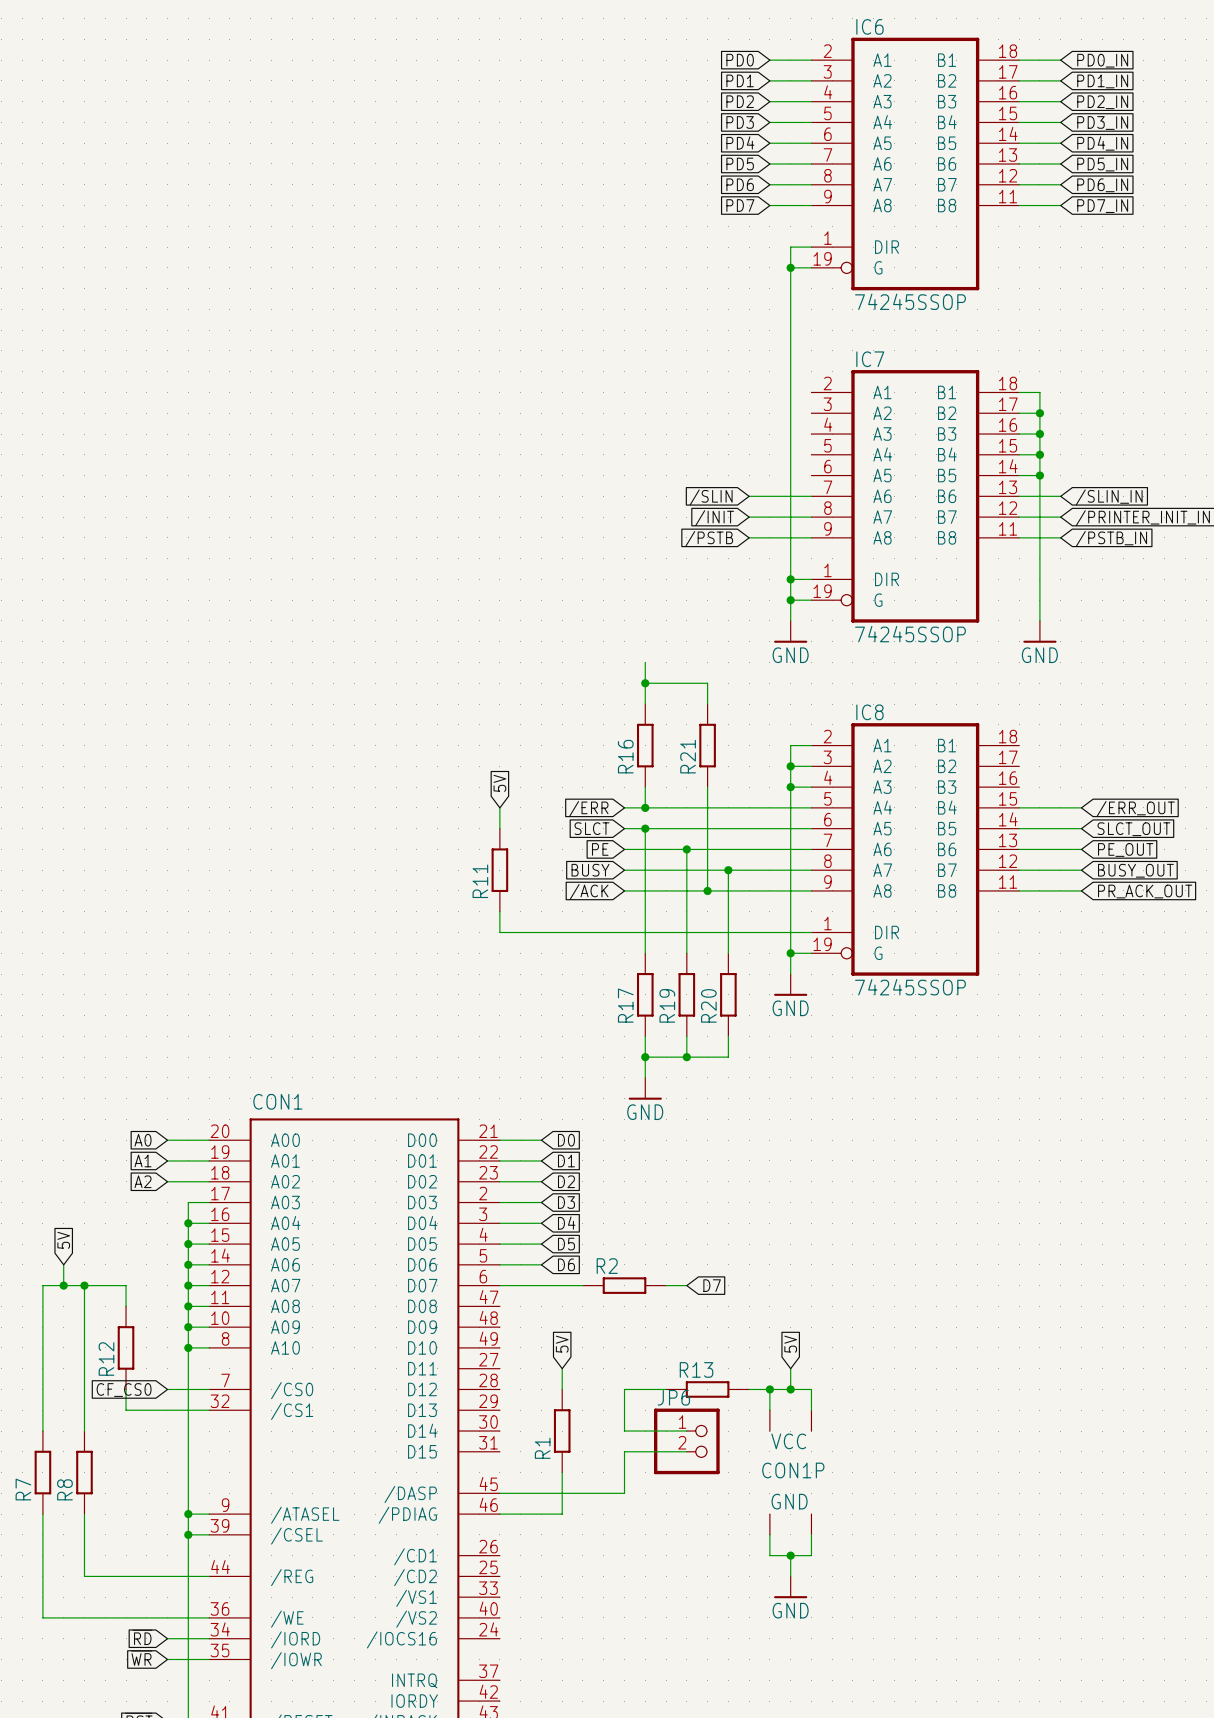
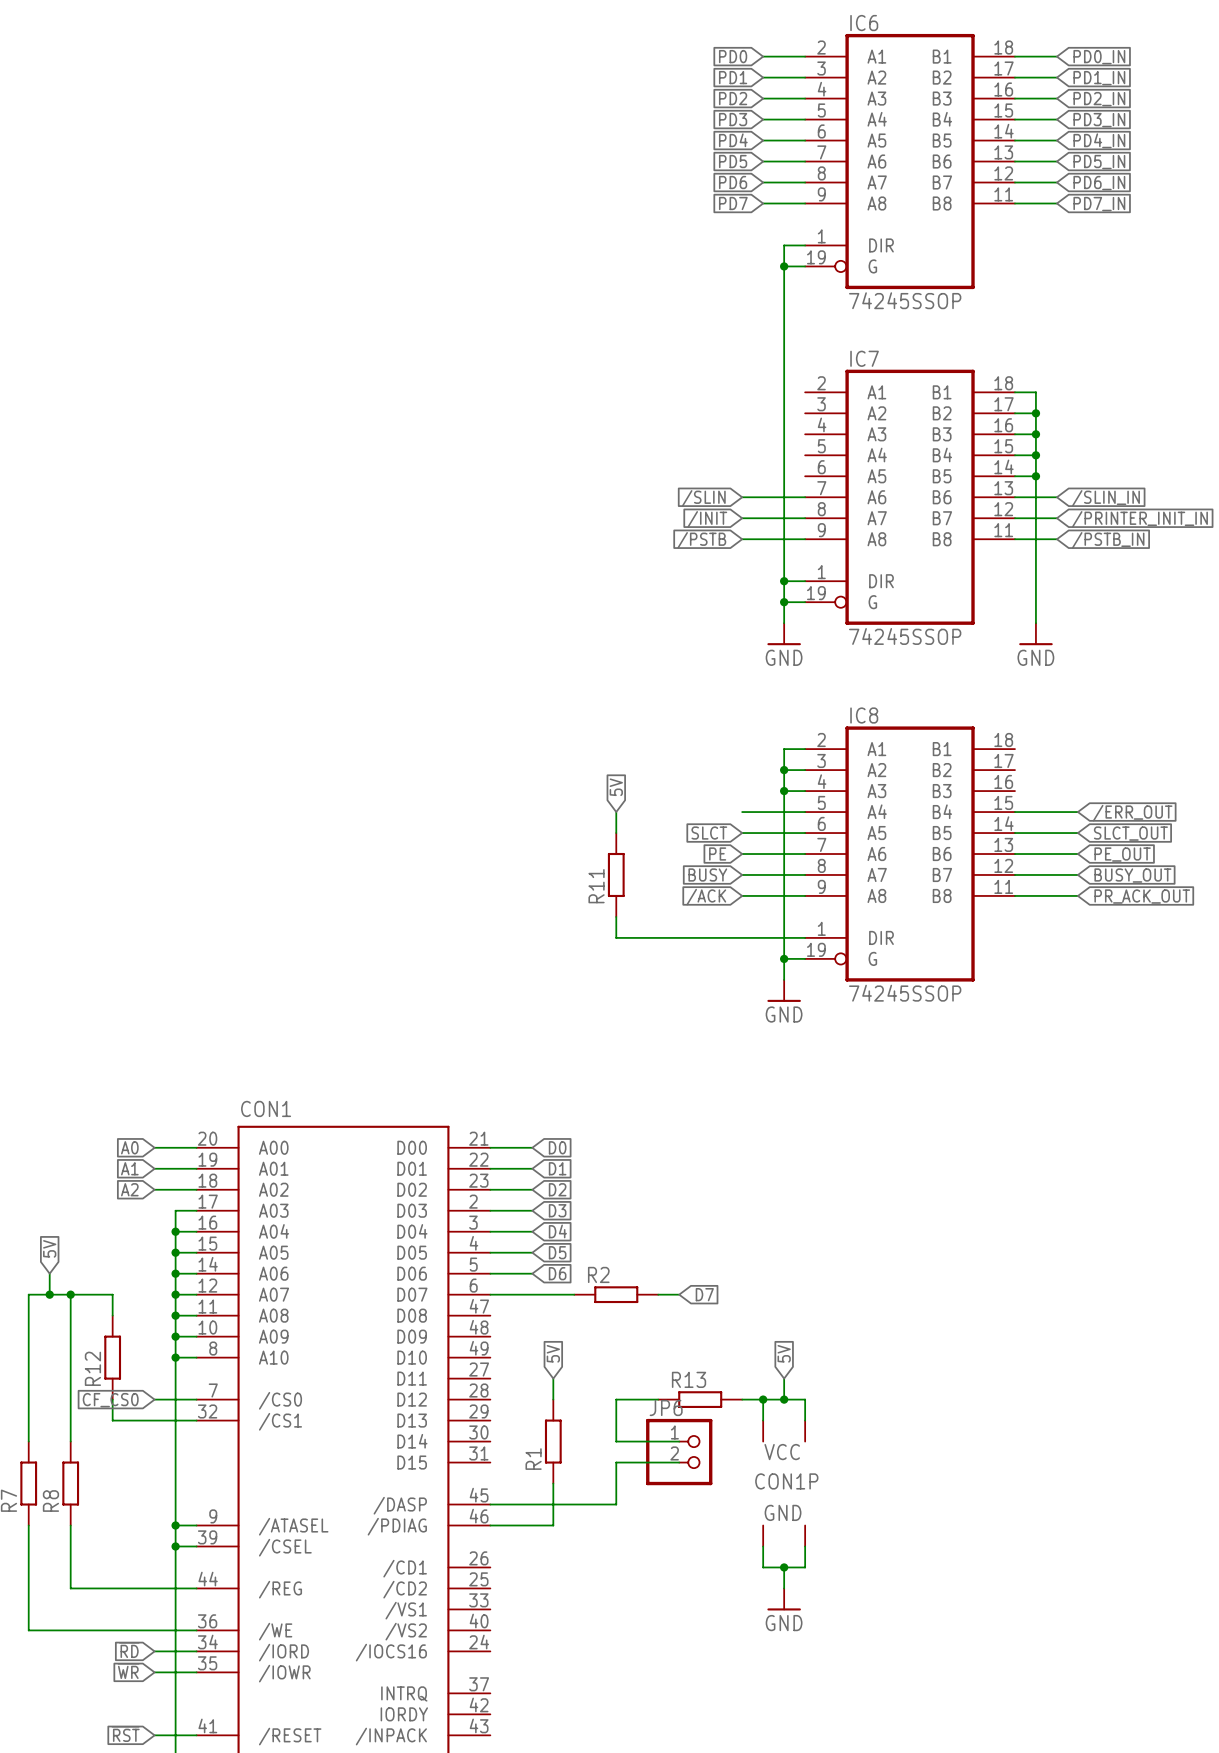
wire: (645, 662) (645, 704) -> none
wire: (645, 683) (707, 683) (707, 704) -> none
junction: (645, 683) -> none
R16: (645, 745) -> none
R21: (707, 745) -> none
global label: 5V (499, 783) -> none
wire: (645, 787) (645, 807) -> none
wire: (707, 787) (707, 890) -> none
wire: (499, 807) (499, 828) -> none
wire: (624, 807) (749, 807) -> (616, 812) (616, 833)
junction: (645, 807) -> none
global label: /ERR (588, 808) -> 5V (616, 787)
global label position: SLCT (592, 828) -> SLCT (709, 833)
wire: (624, 828) (749, 828) -> none
wire: (645, 828) (645, 953) -> none
junction: (645, 828) -> none
global label position: PE (600, 849) -> PE (717, 854)
wire: (624, 849) (749, 849) -> none
wire: (686, 849) (686, 953) -> none
junction: (686, 849) -> none
R11 position: (499, 870) -> (616, 874)
global label position: BUSY (590, 870) -> BUSY (707, 874)
wire: (624, 870) (749, 870) -> none
wire: (728, 870) (728, 953) -> none
junction: (728, 870) -> none
wire: (624, 890) (749, 890) -> none
junction: (707, 890) -> none
global label position: /ACK (589, 892) -> /ACK (706, 897)
wire: (499, 911) (499, 932) (624, 932) -> (616, 916) (616, 937)
R17: (645, 994) -> none
R19: (686, 994) -> none
R20: (728, 994) -> none
wire: (645, 1036) (645, 1077) -> none
wire: (686, 1036) (686, 1057) -> none
wire: (728, 1036) (728, 1057) (645, 1057) -> none
junction: (645, 1057) -> none
junction: (686, 1057) -> none
power symbol: GND (645, 1088) -> none

